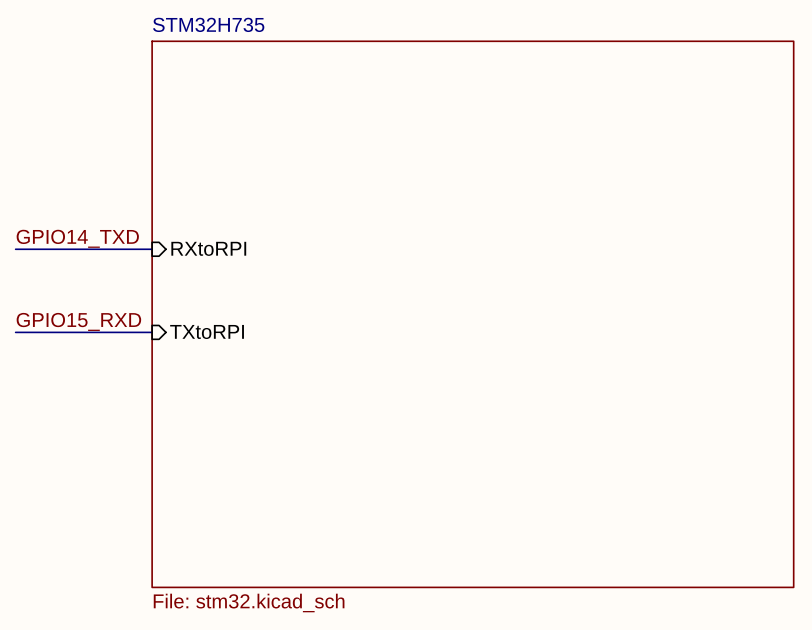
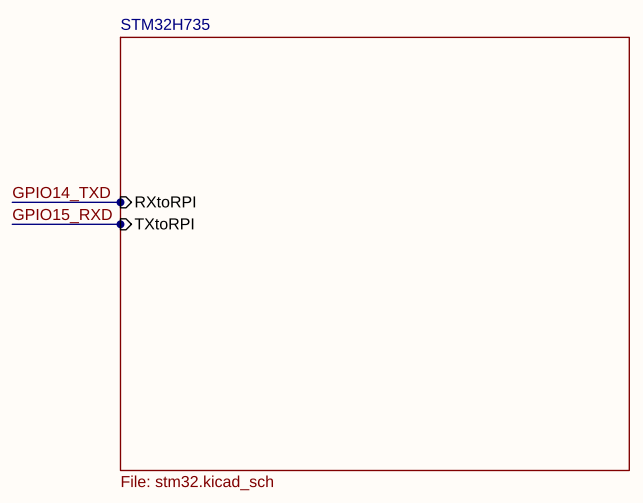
junction: none -> (120, 202)
wire: none -> (12, 224) (122, 224)
junction: none -> (120, 224)
label position: GPIO15_RXD (78, 321) -> GPIO15_RXD (62, 216)
sheet pin position: TXtoRPI (207, 331) -> TXtoRPI (164, 223)
wire: (15, 332) (152, 332) -> none

